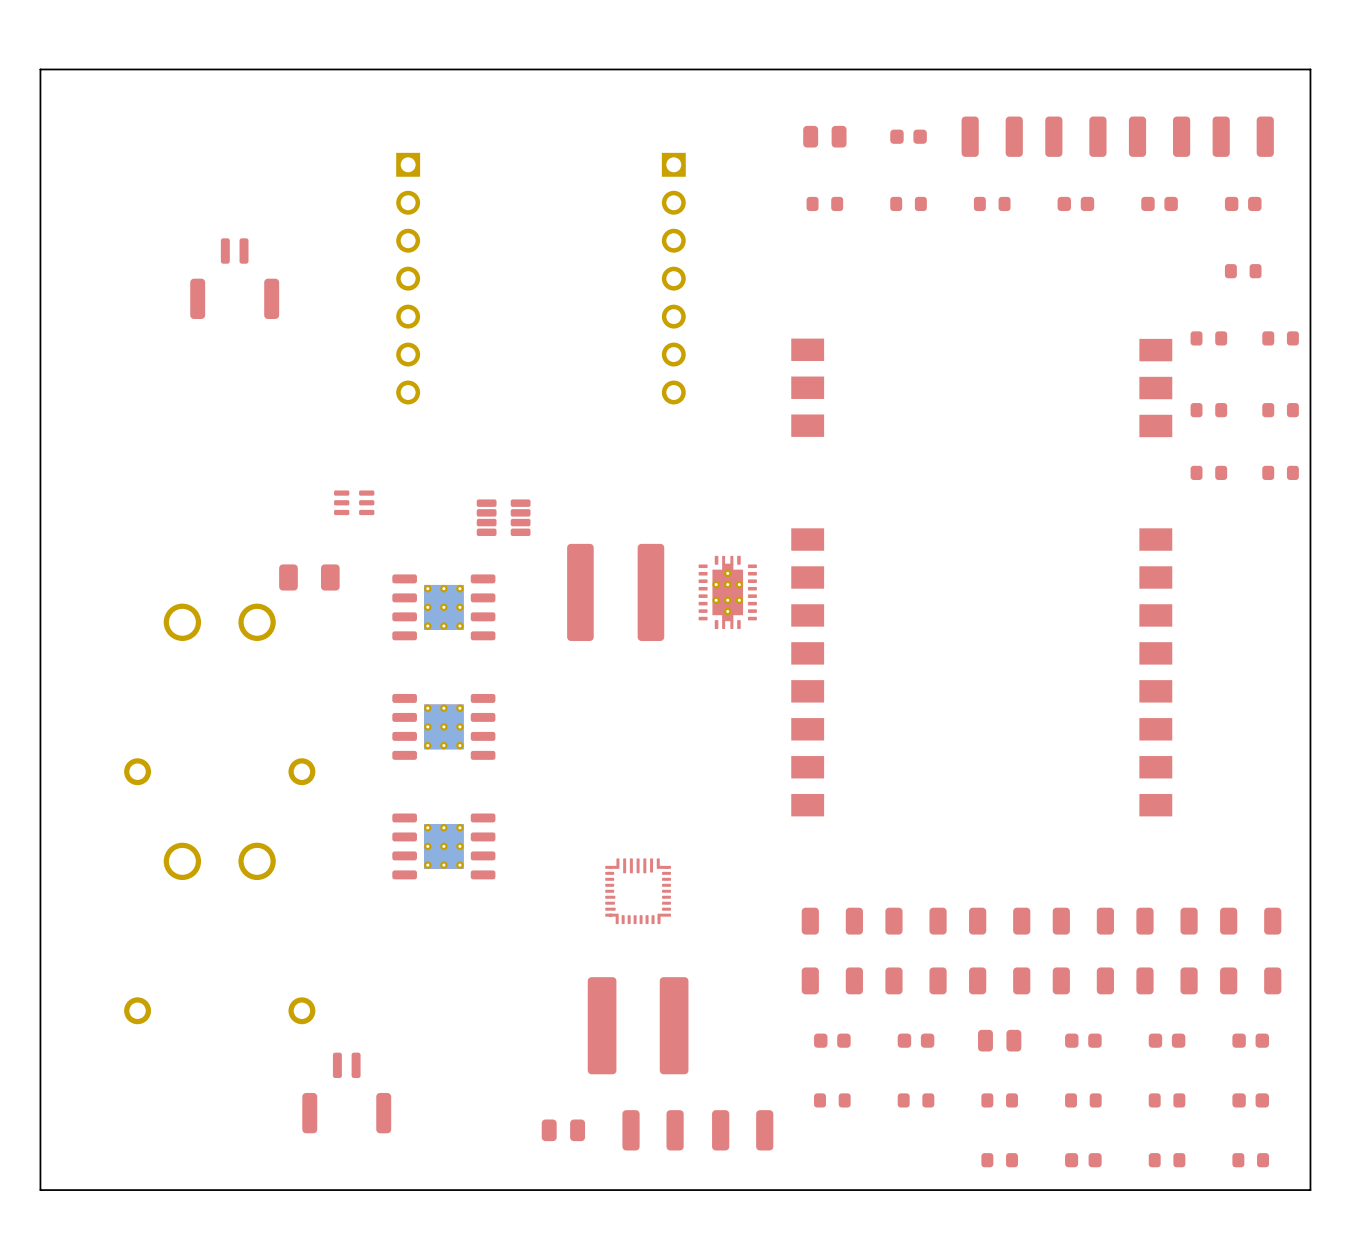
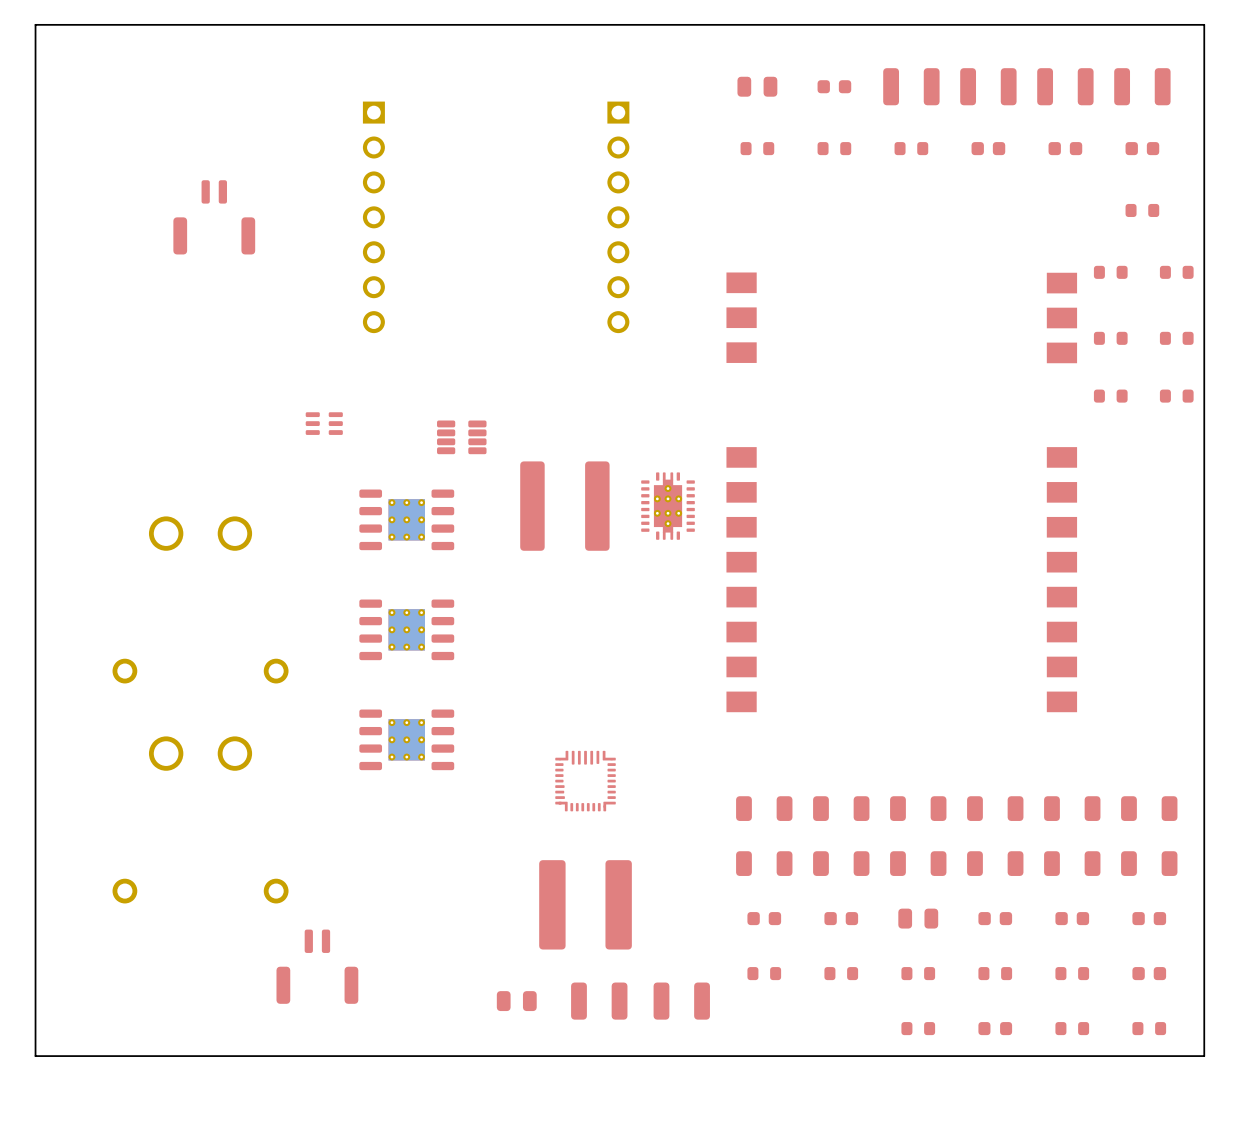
part: (309, 577) -> none

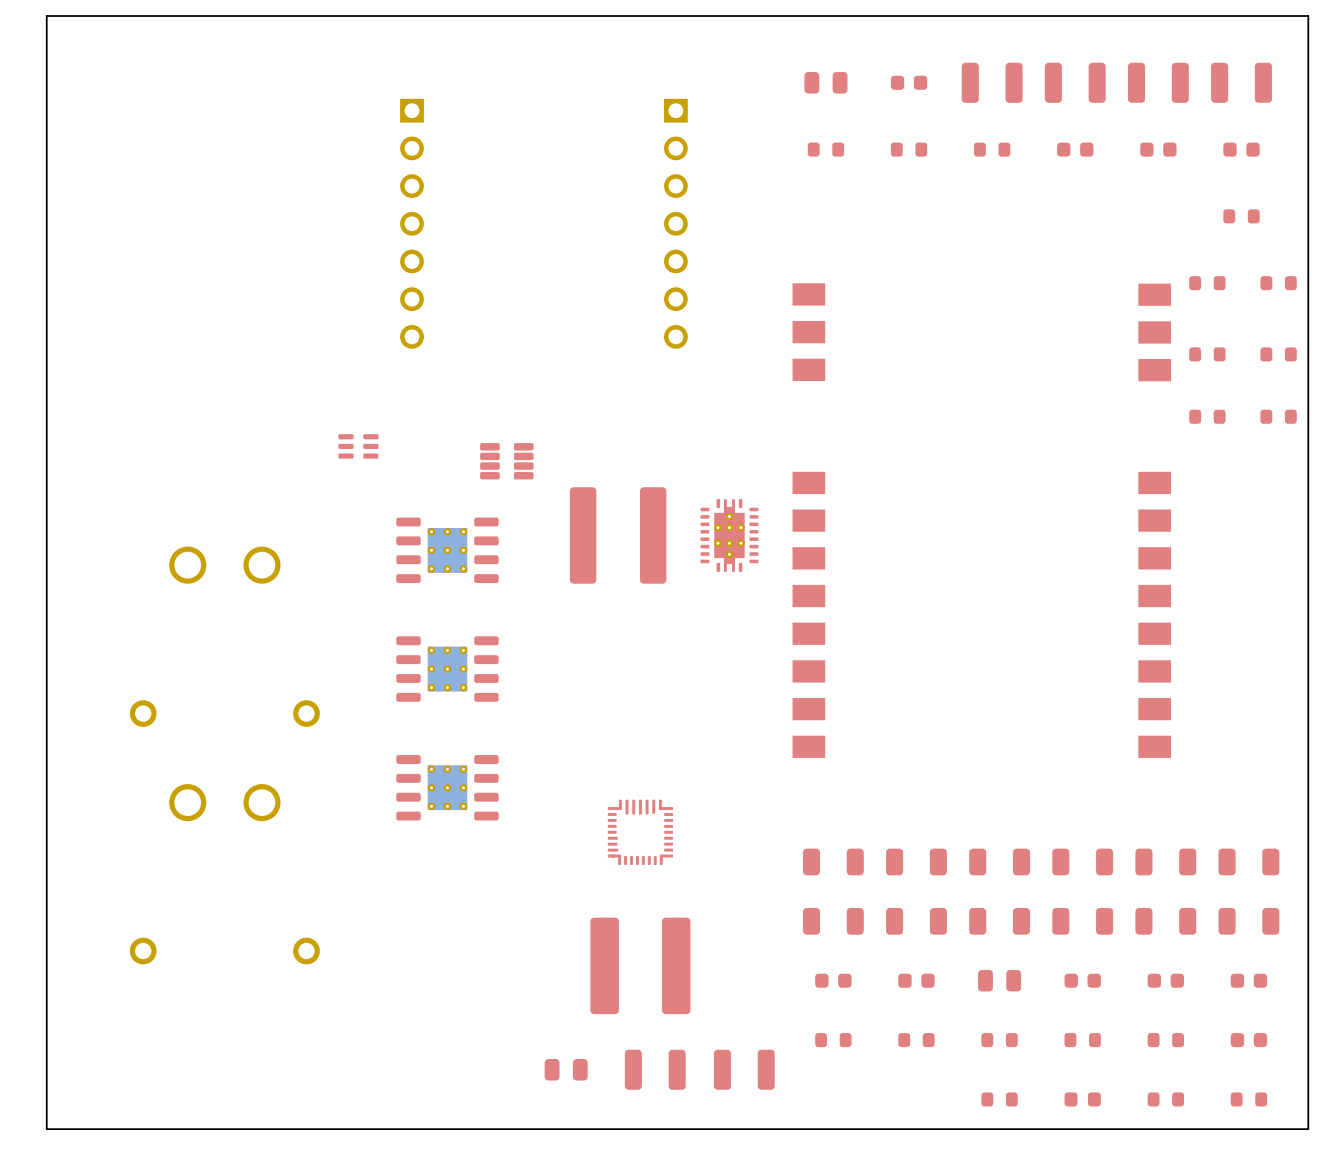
part: (214, 217) -> none
part: (317, 966) -> none

